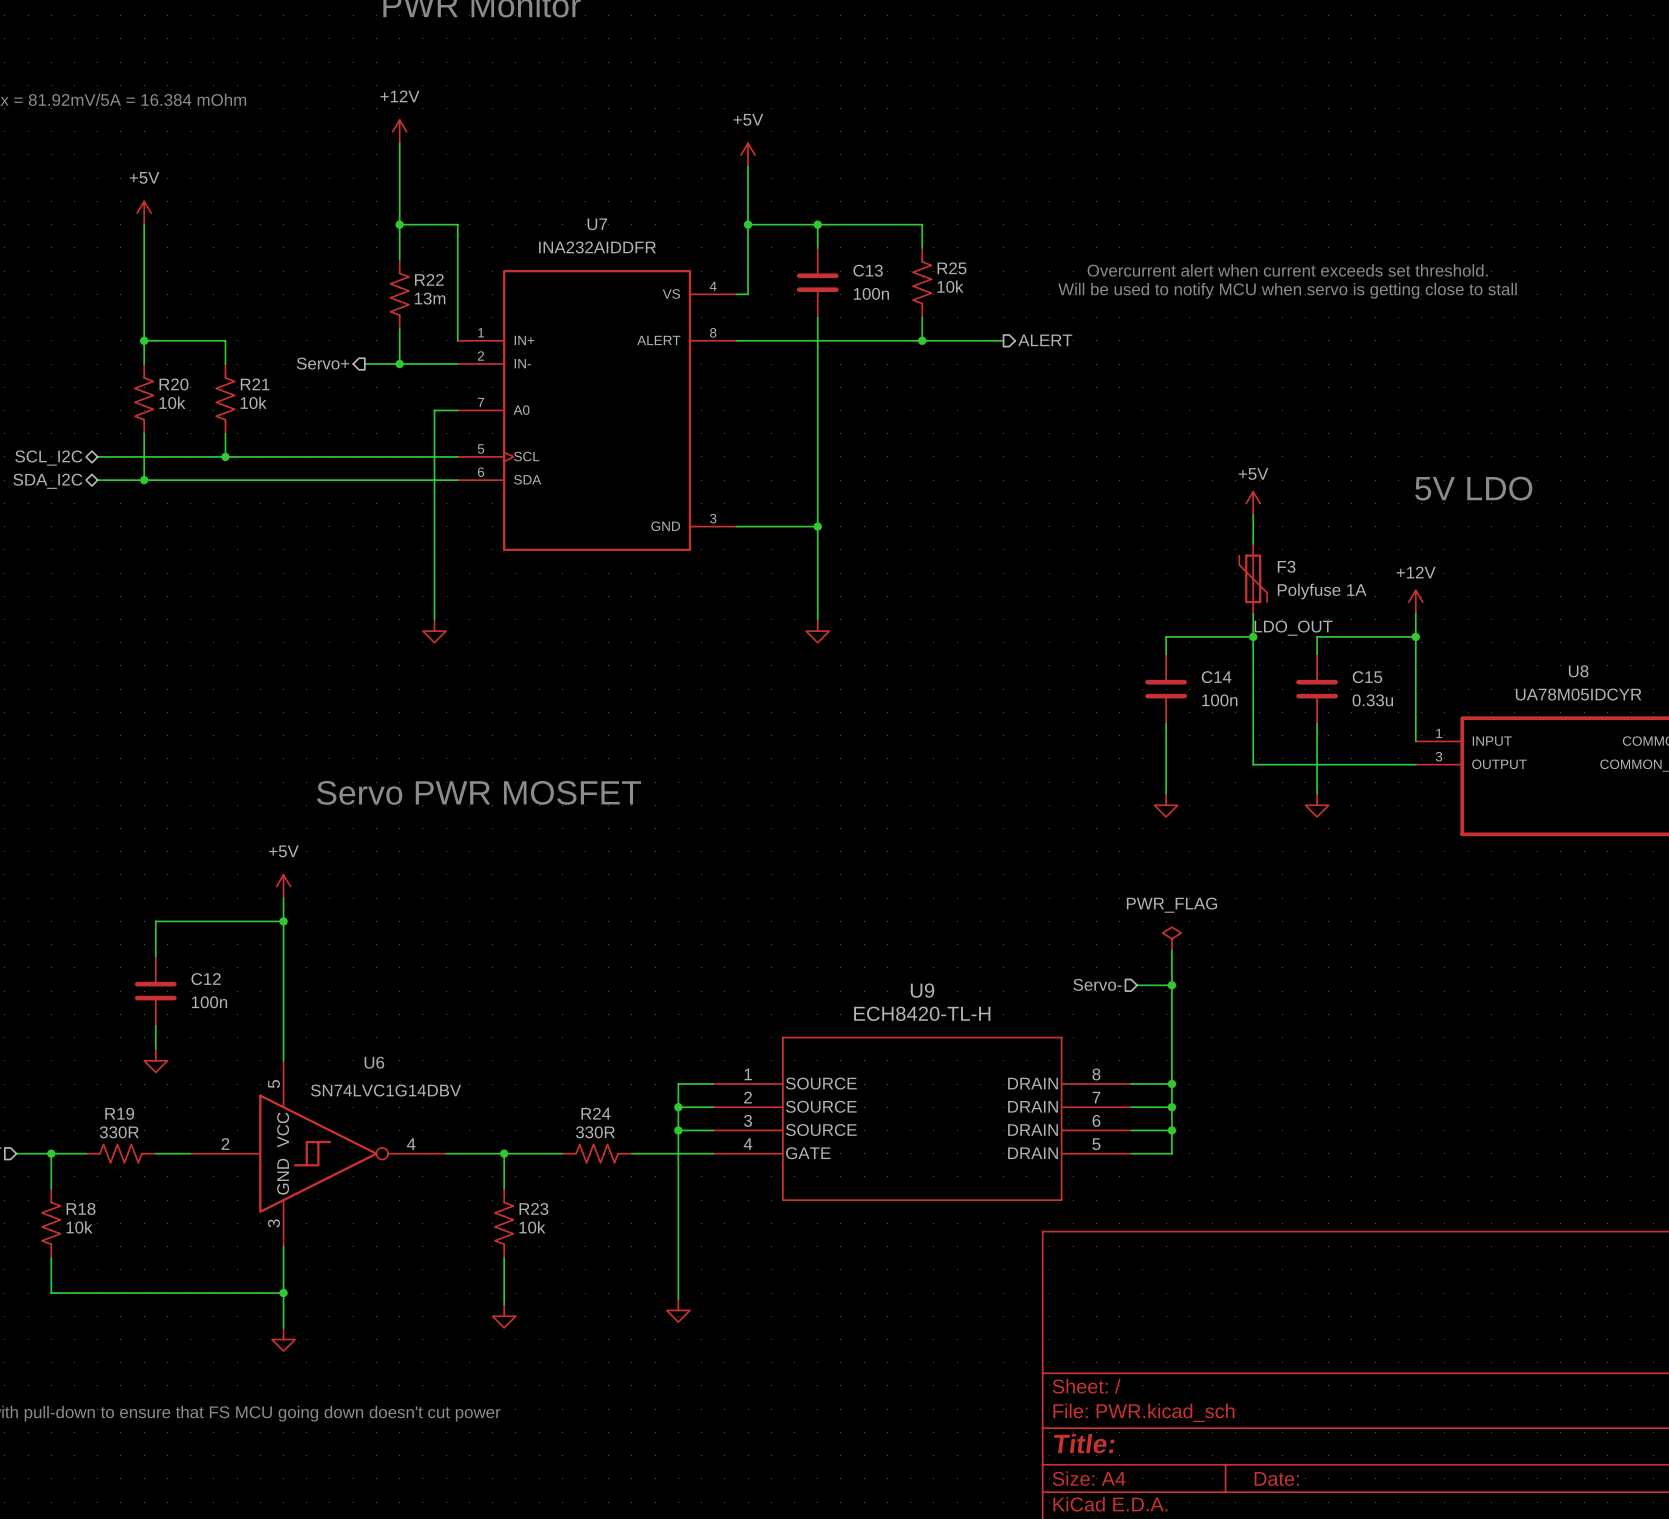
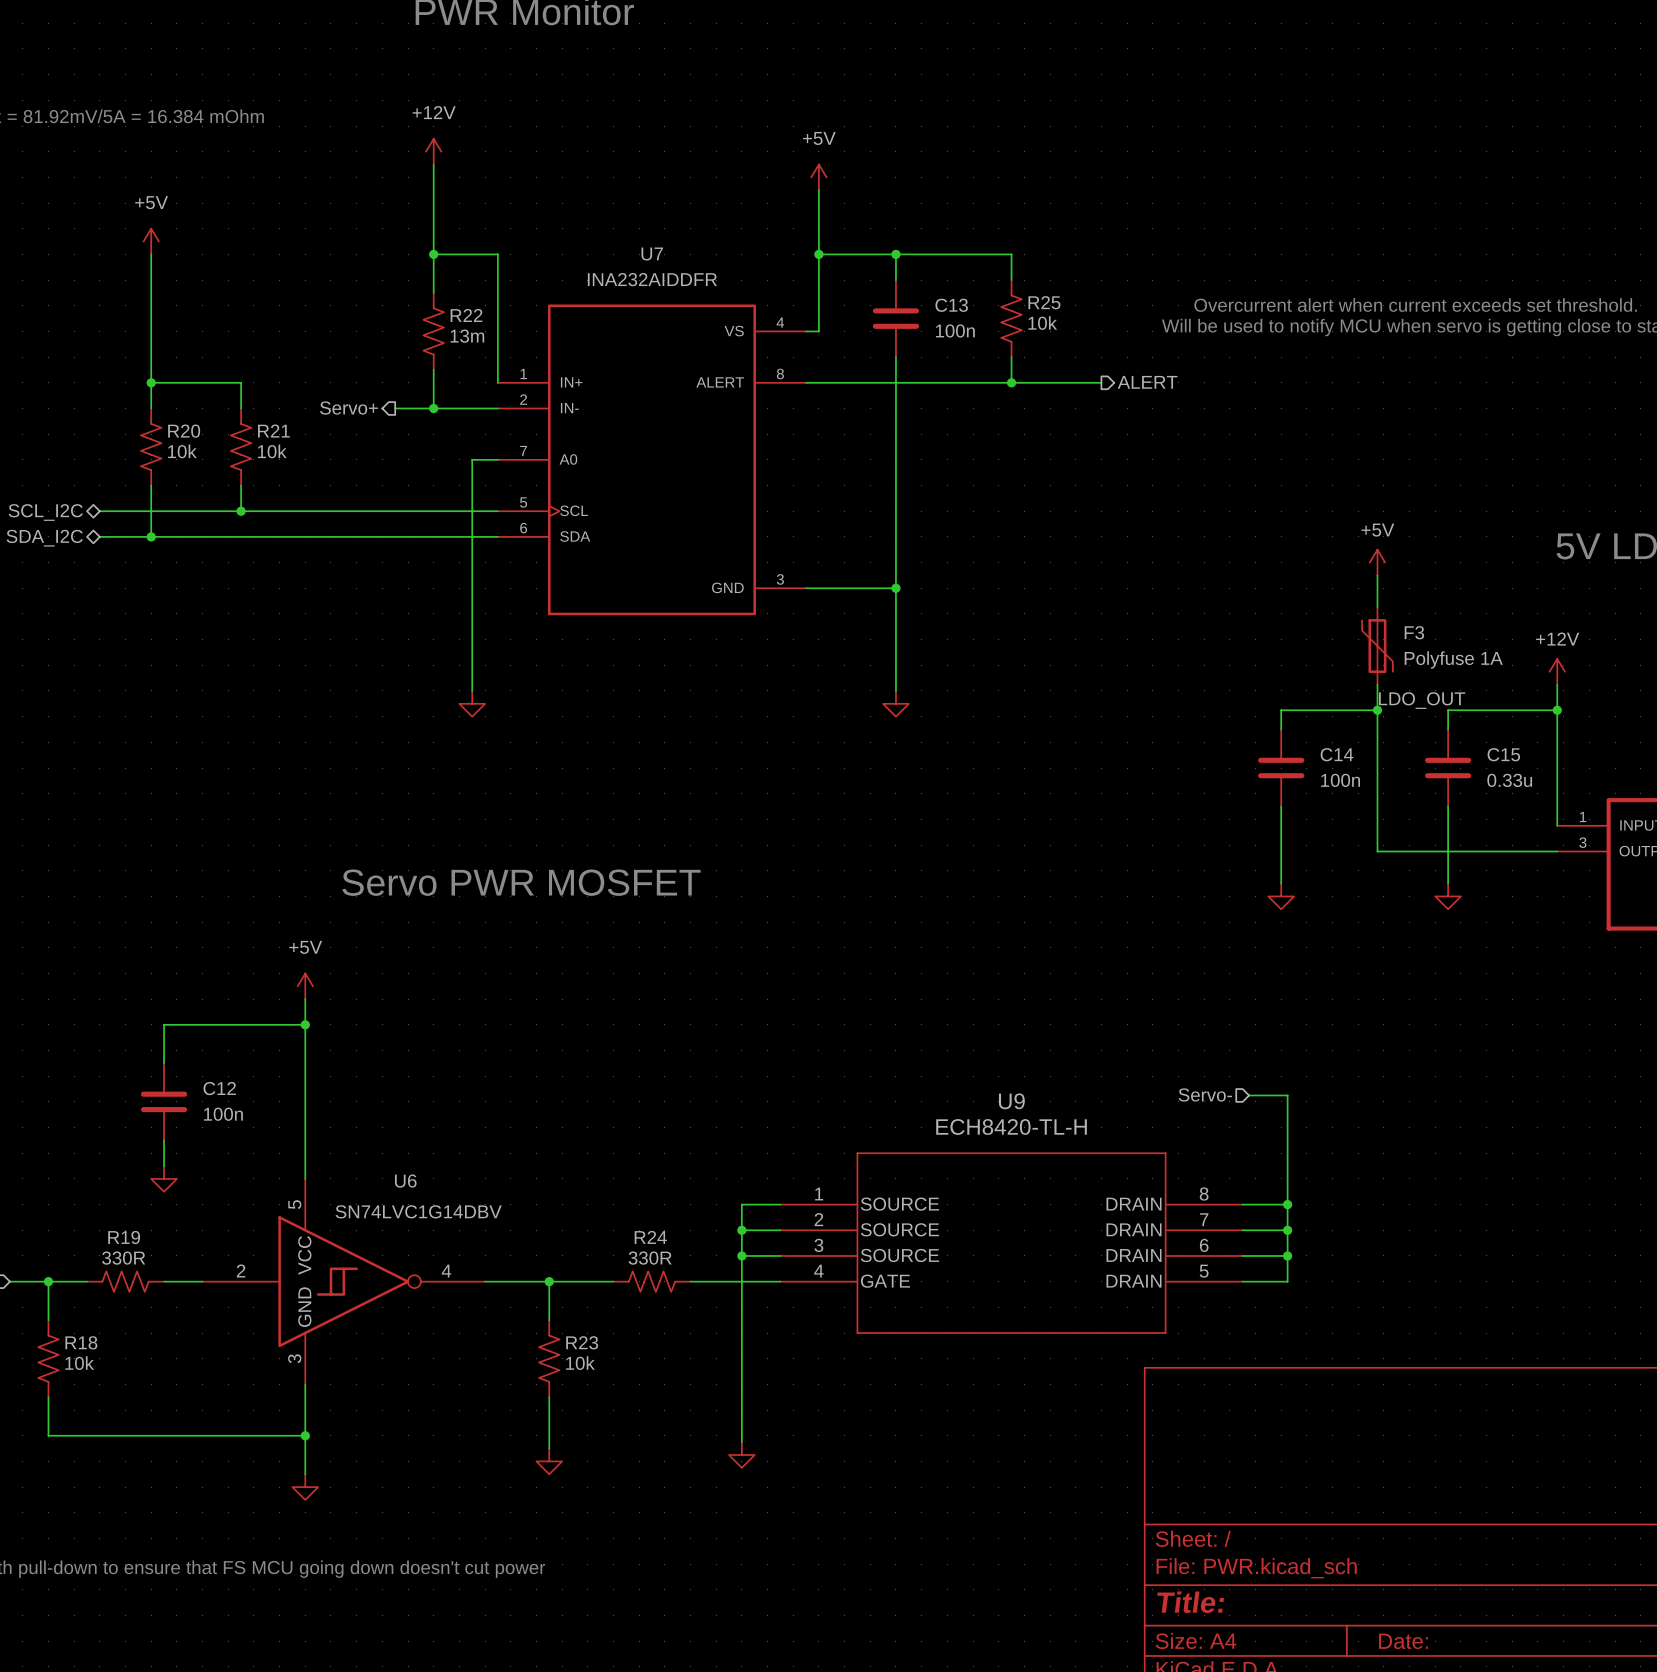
power symbol: PWR_FLAG (1171, 938) -> none
wire: (1171, 950) (1171, 985) -> none
junction: (1171, 985) -> none

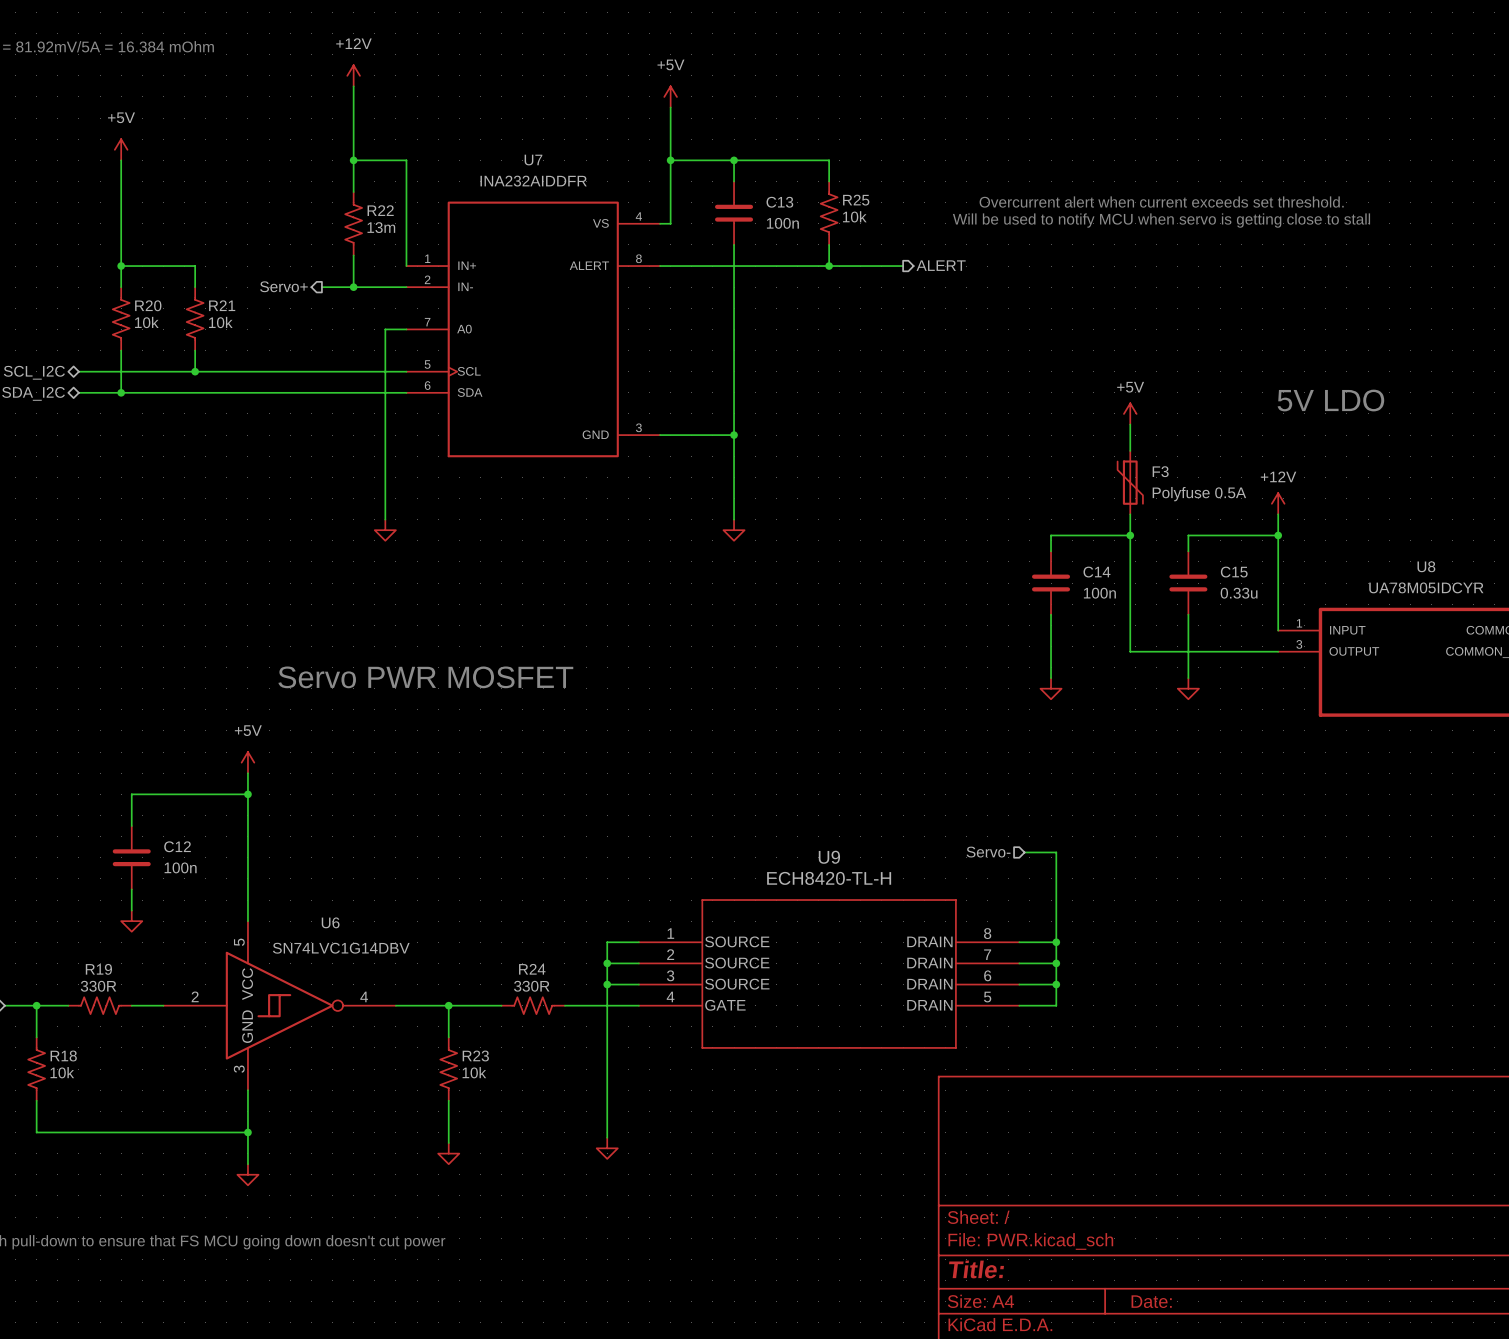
F3 value: Polyfuse 1A (1453, 660) -> Polyfuse 0.5A (1199, 494)
label: LDO_OUT (1422, 700) -> none

